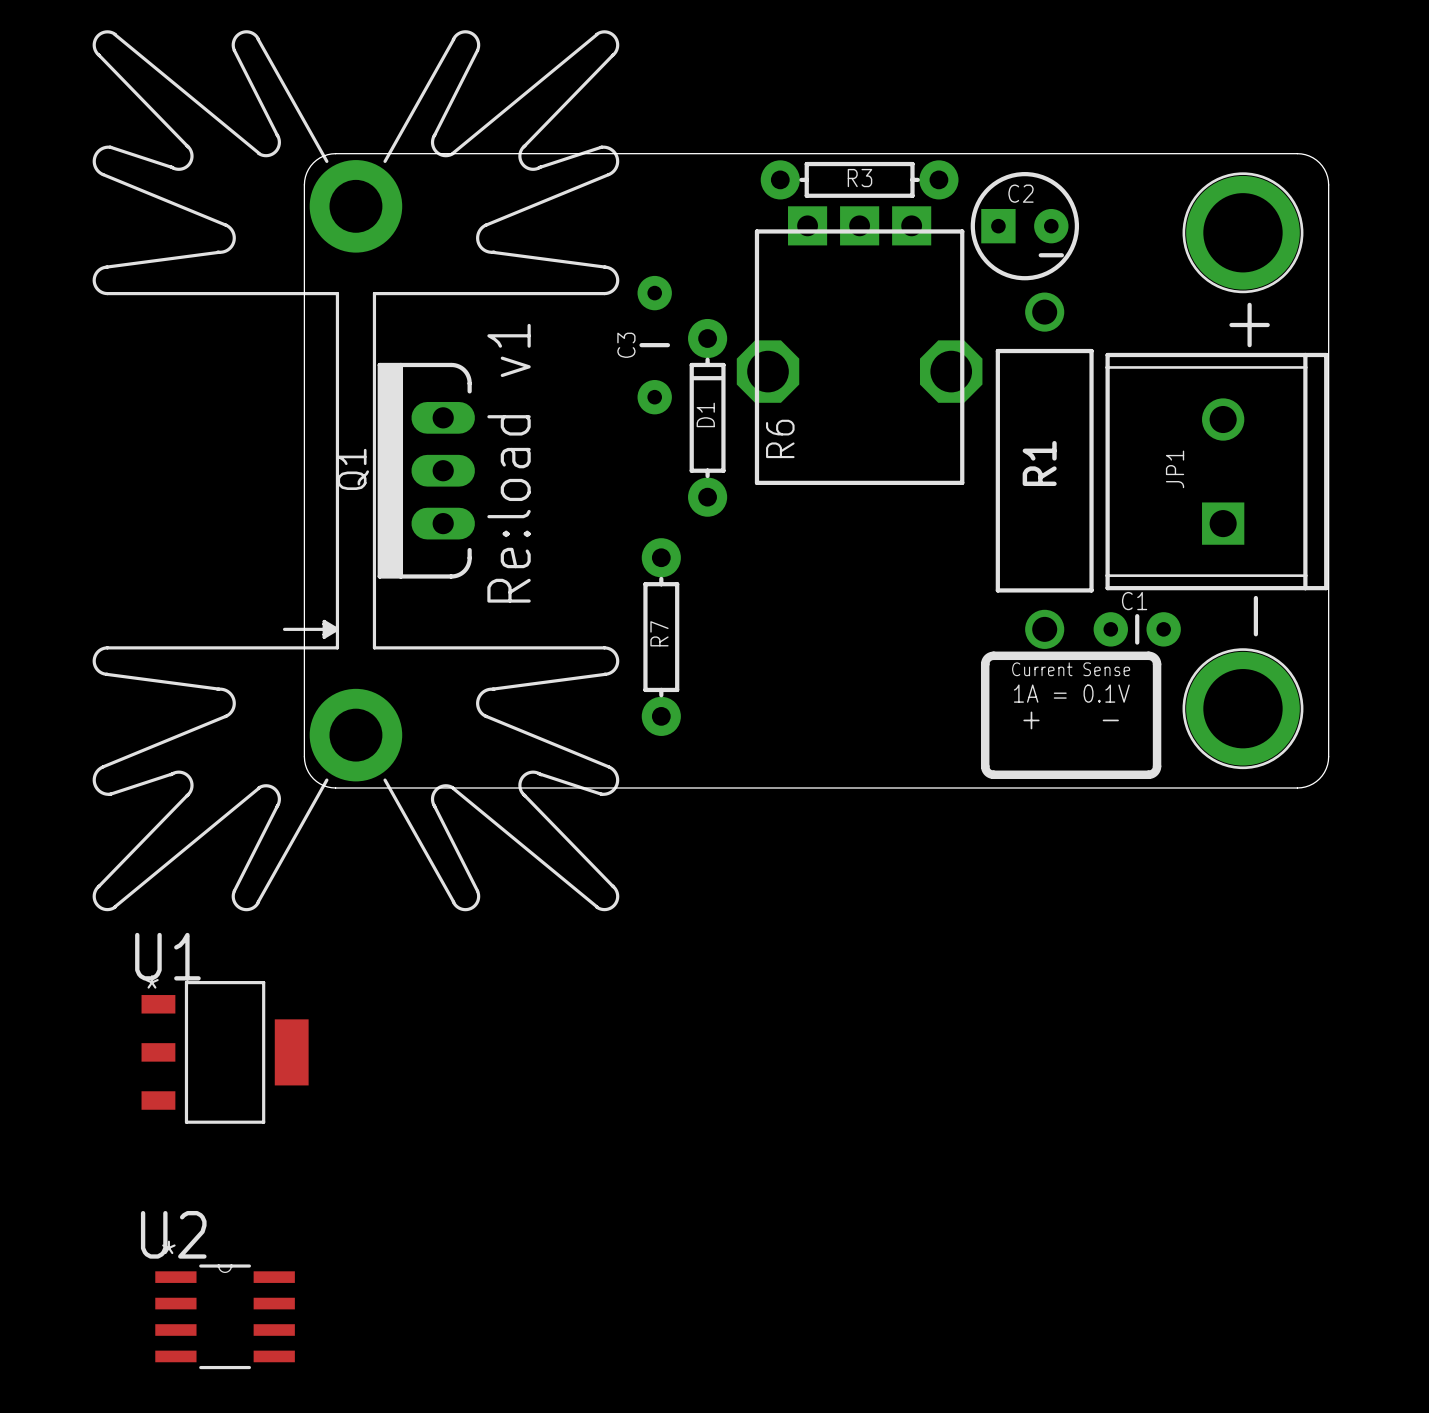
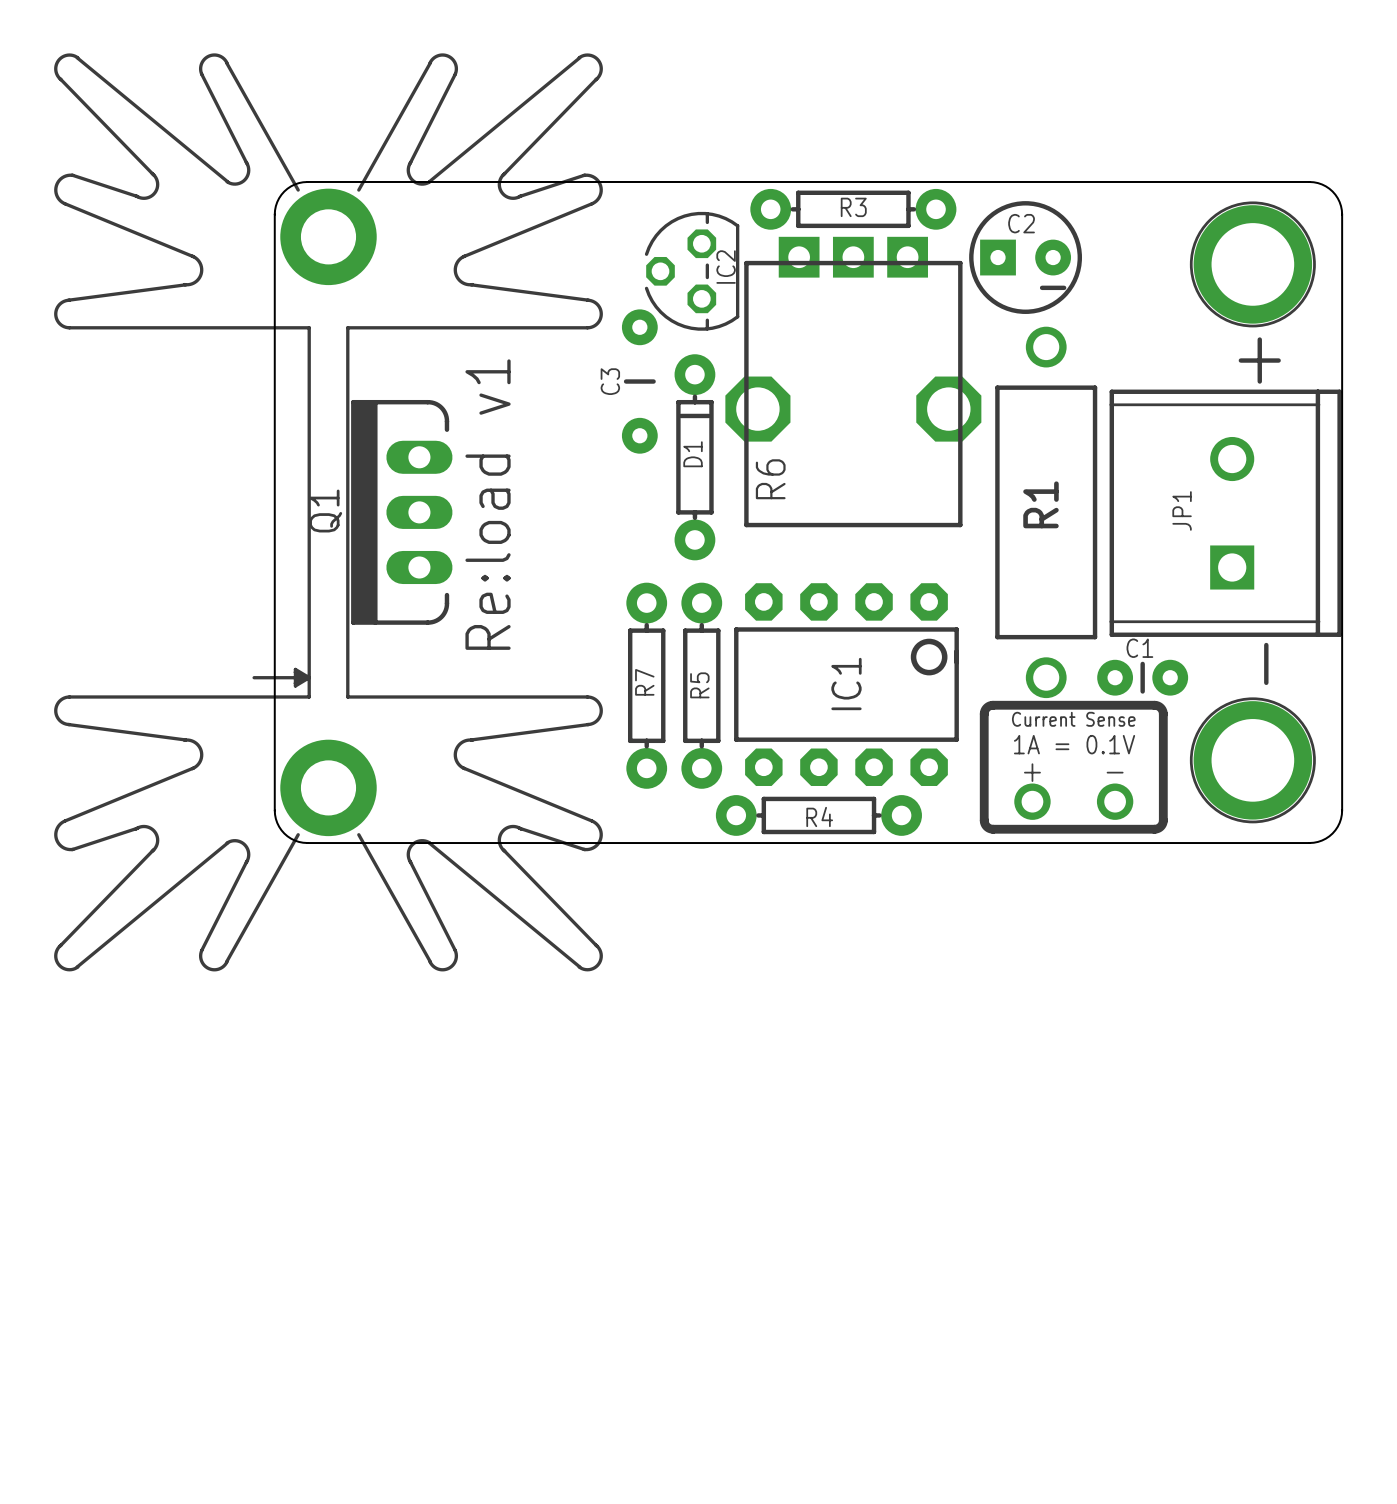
IC2: none -> (692, 271)
IC1: none -> (846, 684)
R5: none -> (701, 685)
part: none -> (1032, 801)
part: none -> (1115, 801)
R4: none -> (818, 815)
U1: (225, 1052) -> none
U2: (225, 1316) -> none

